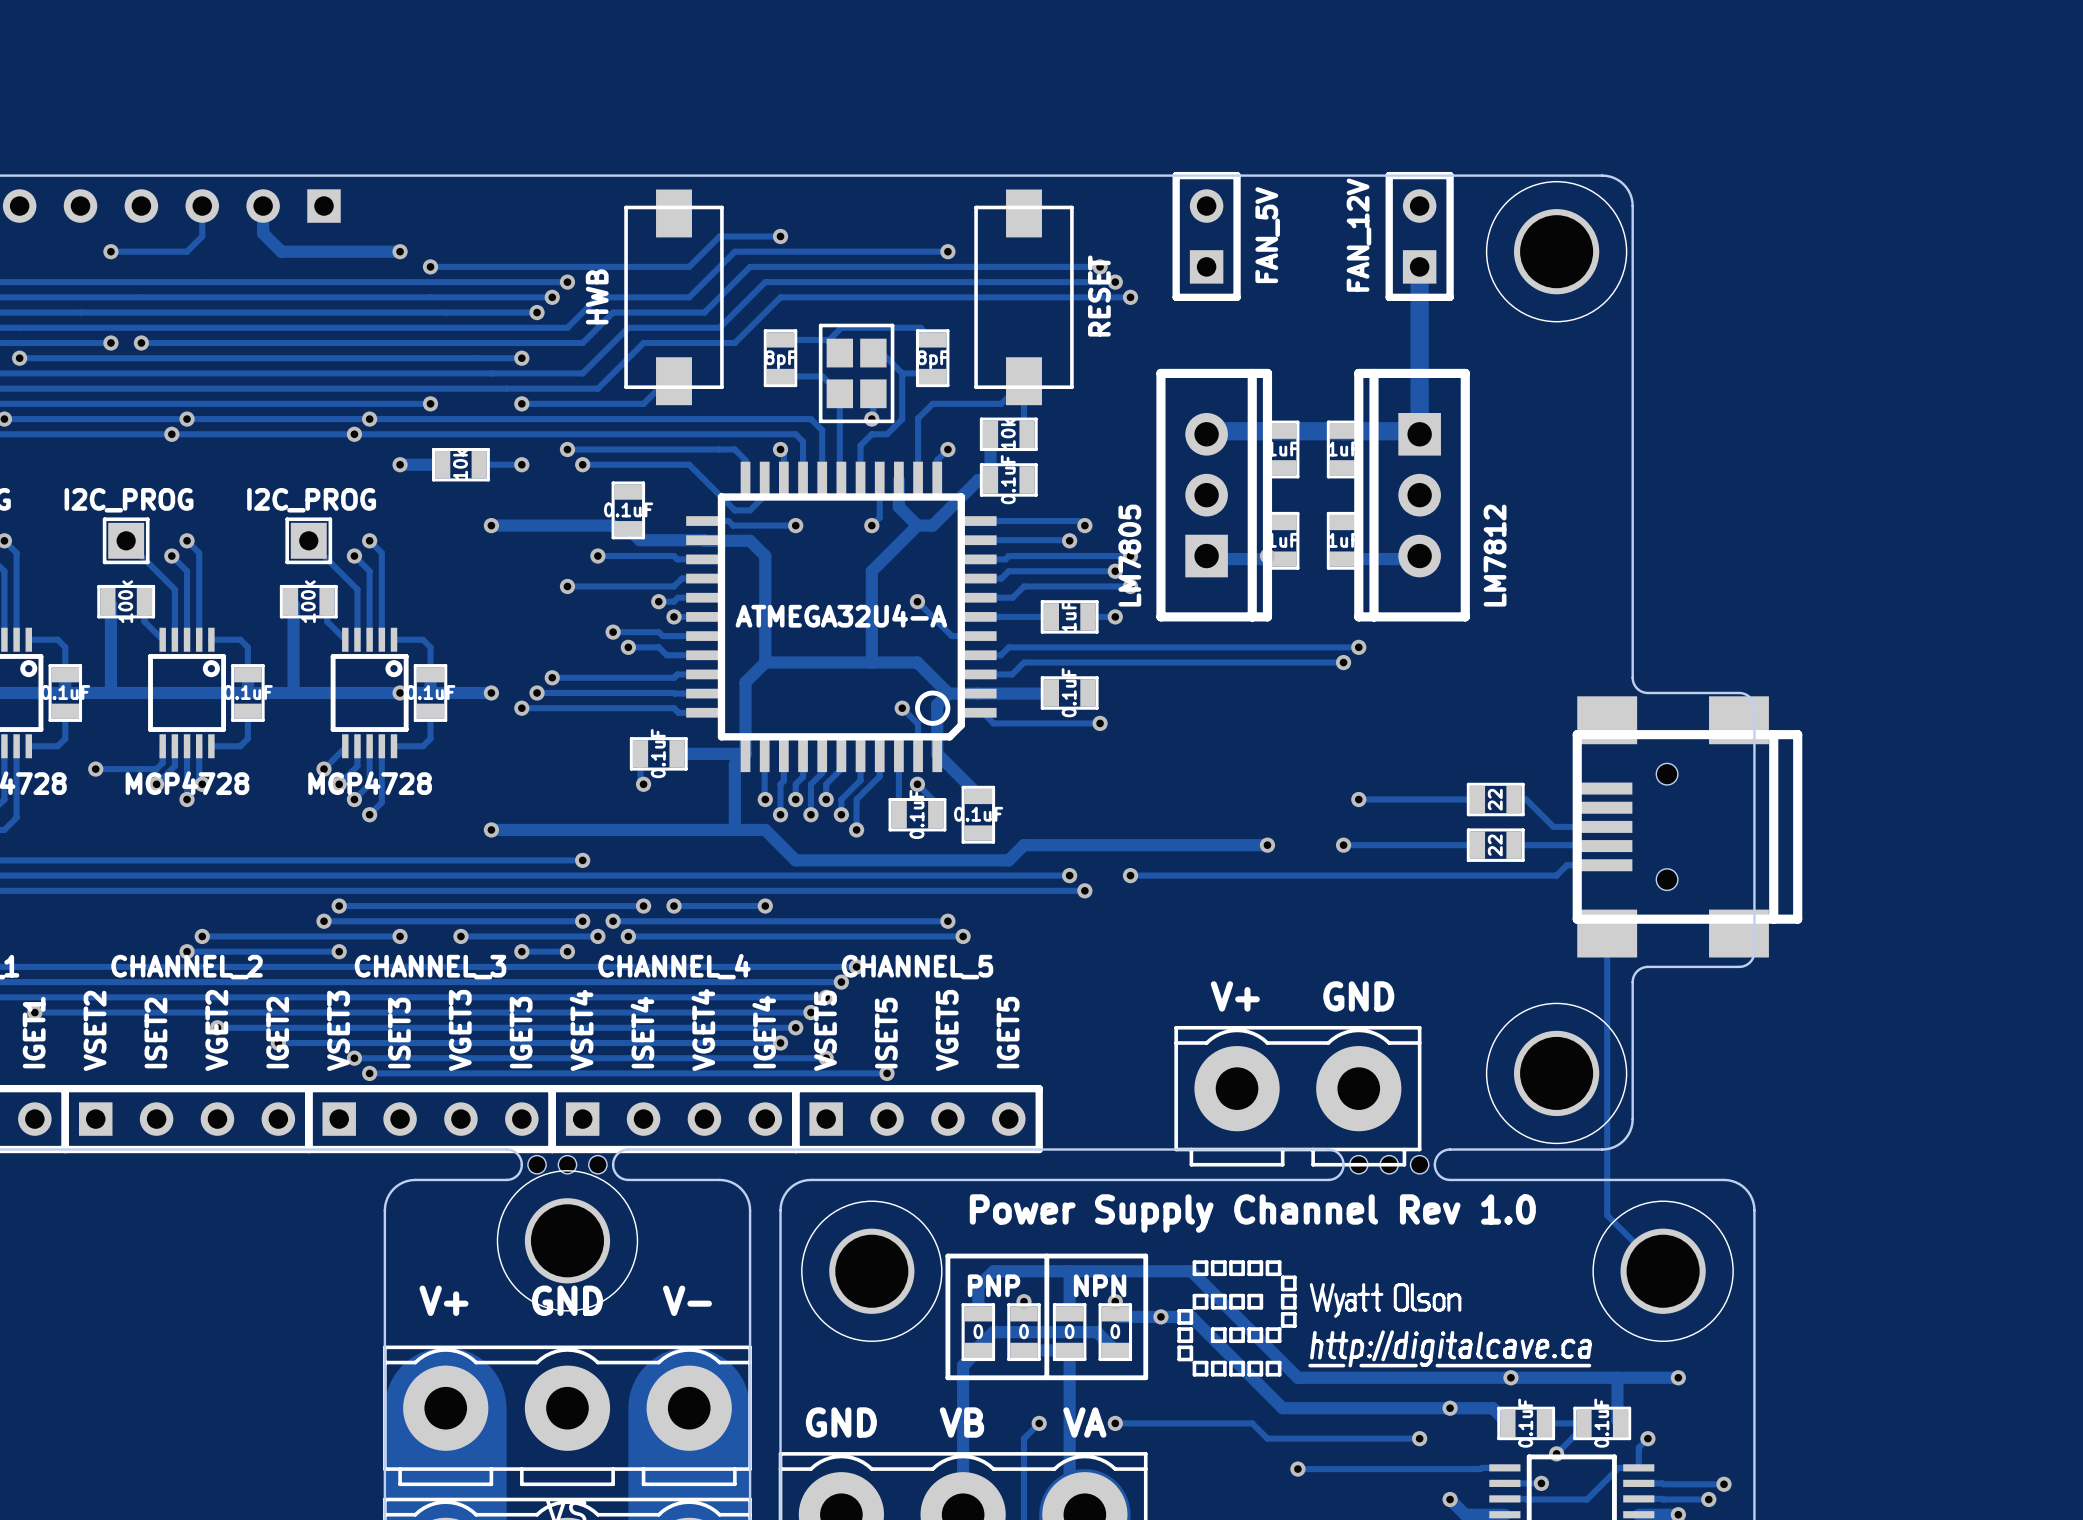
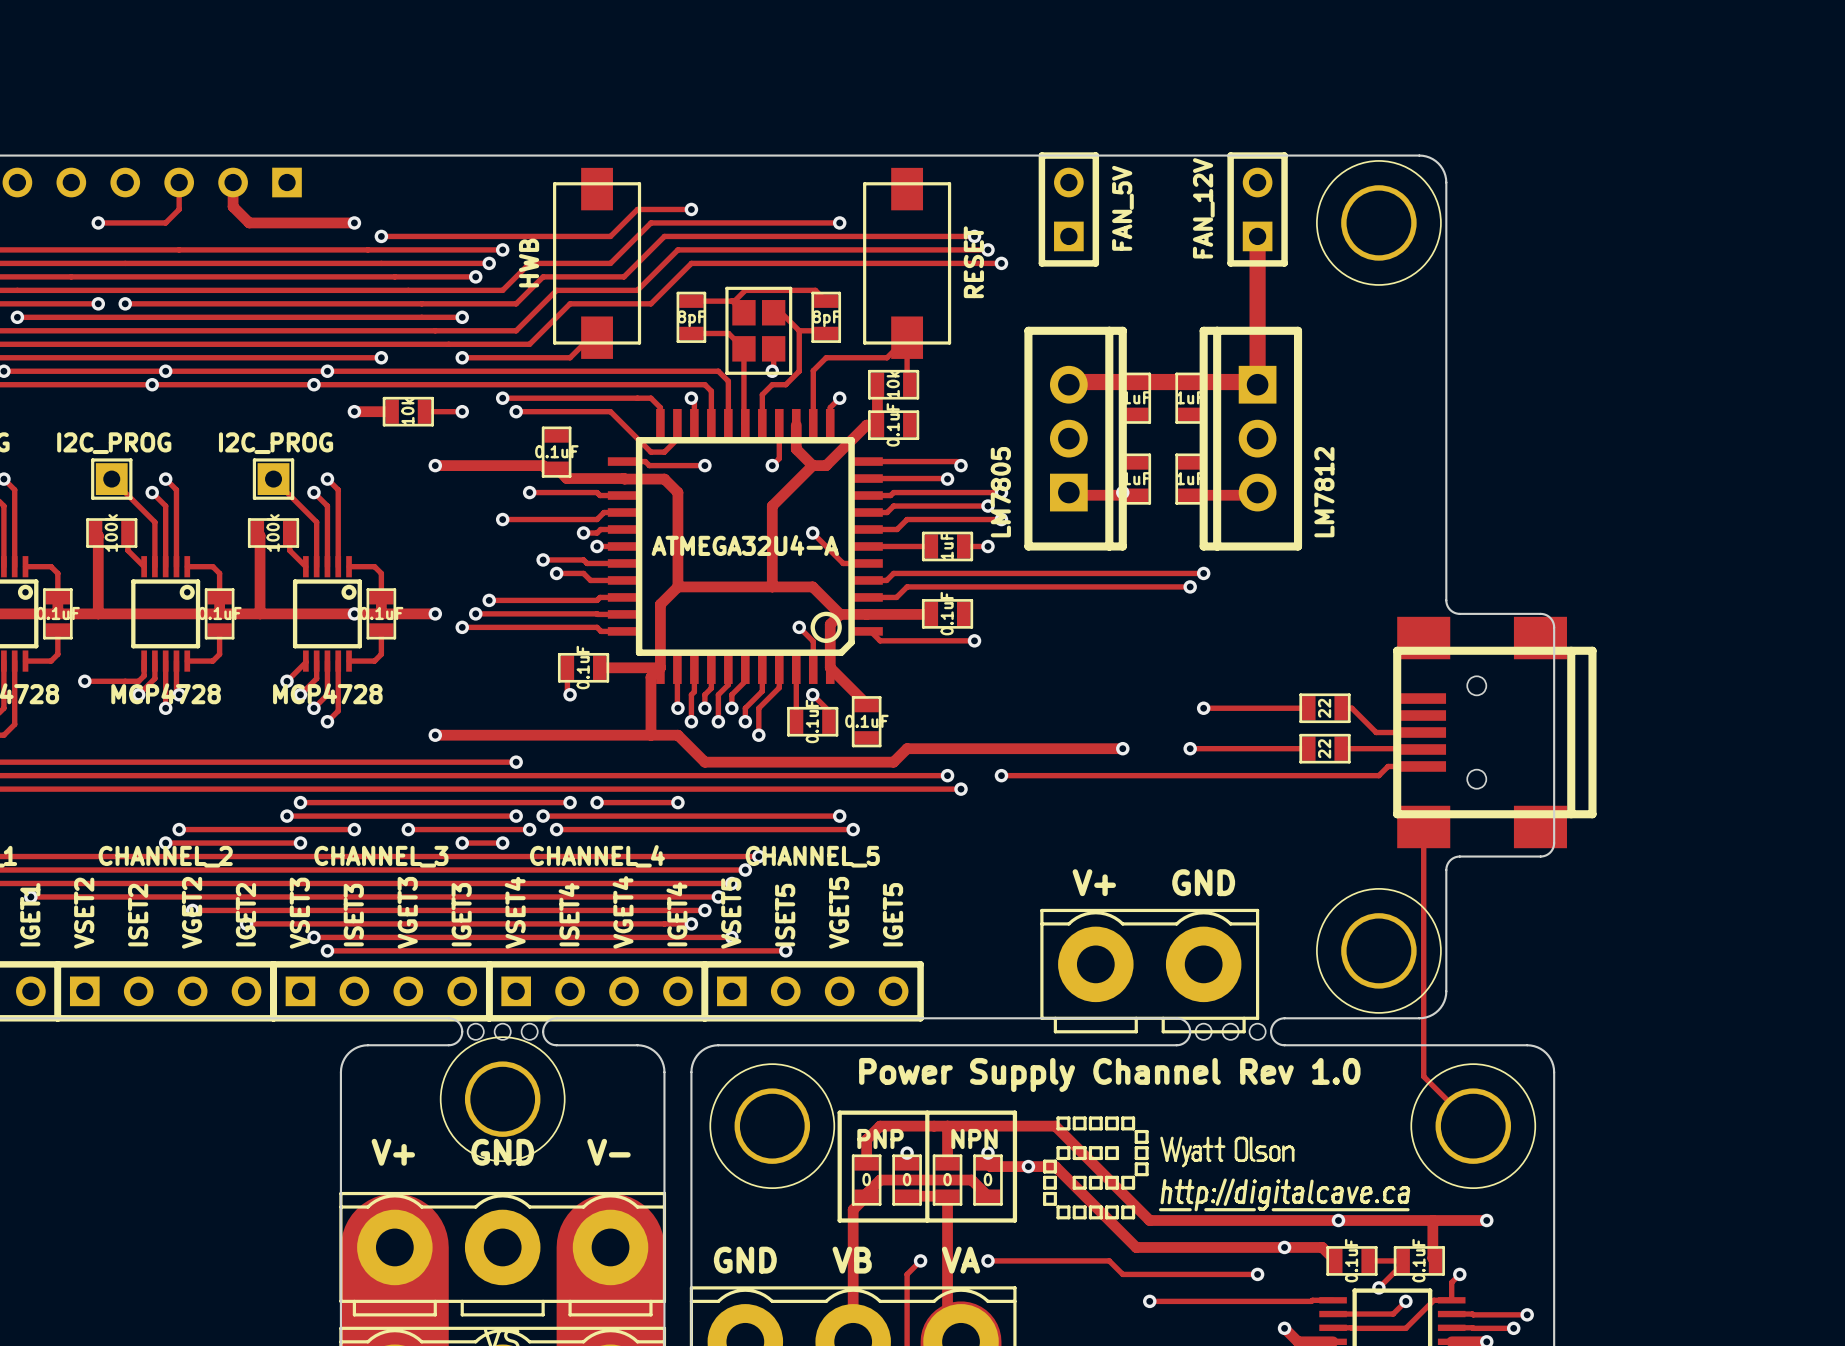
track: none -> (1405, 1301) (1393, 1314) (1365, 1314)
via position: (1541, 1483) -> (1405, 1301)

